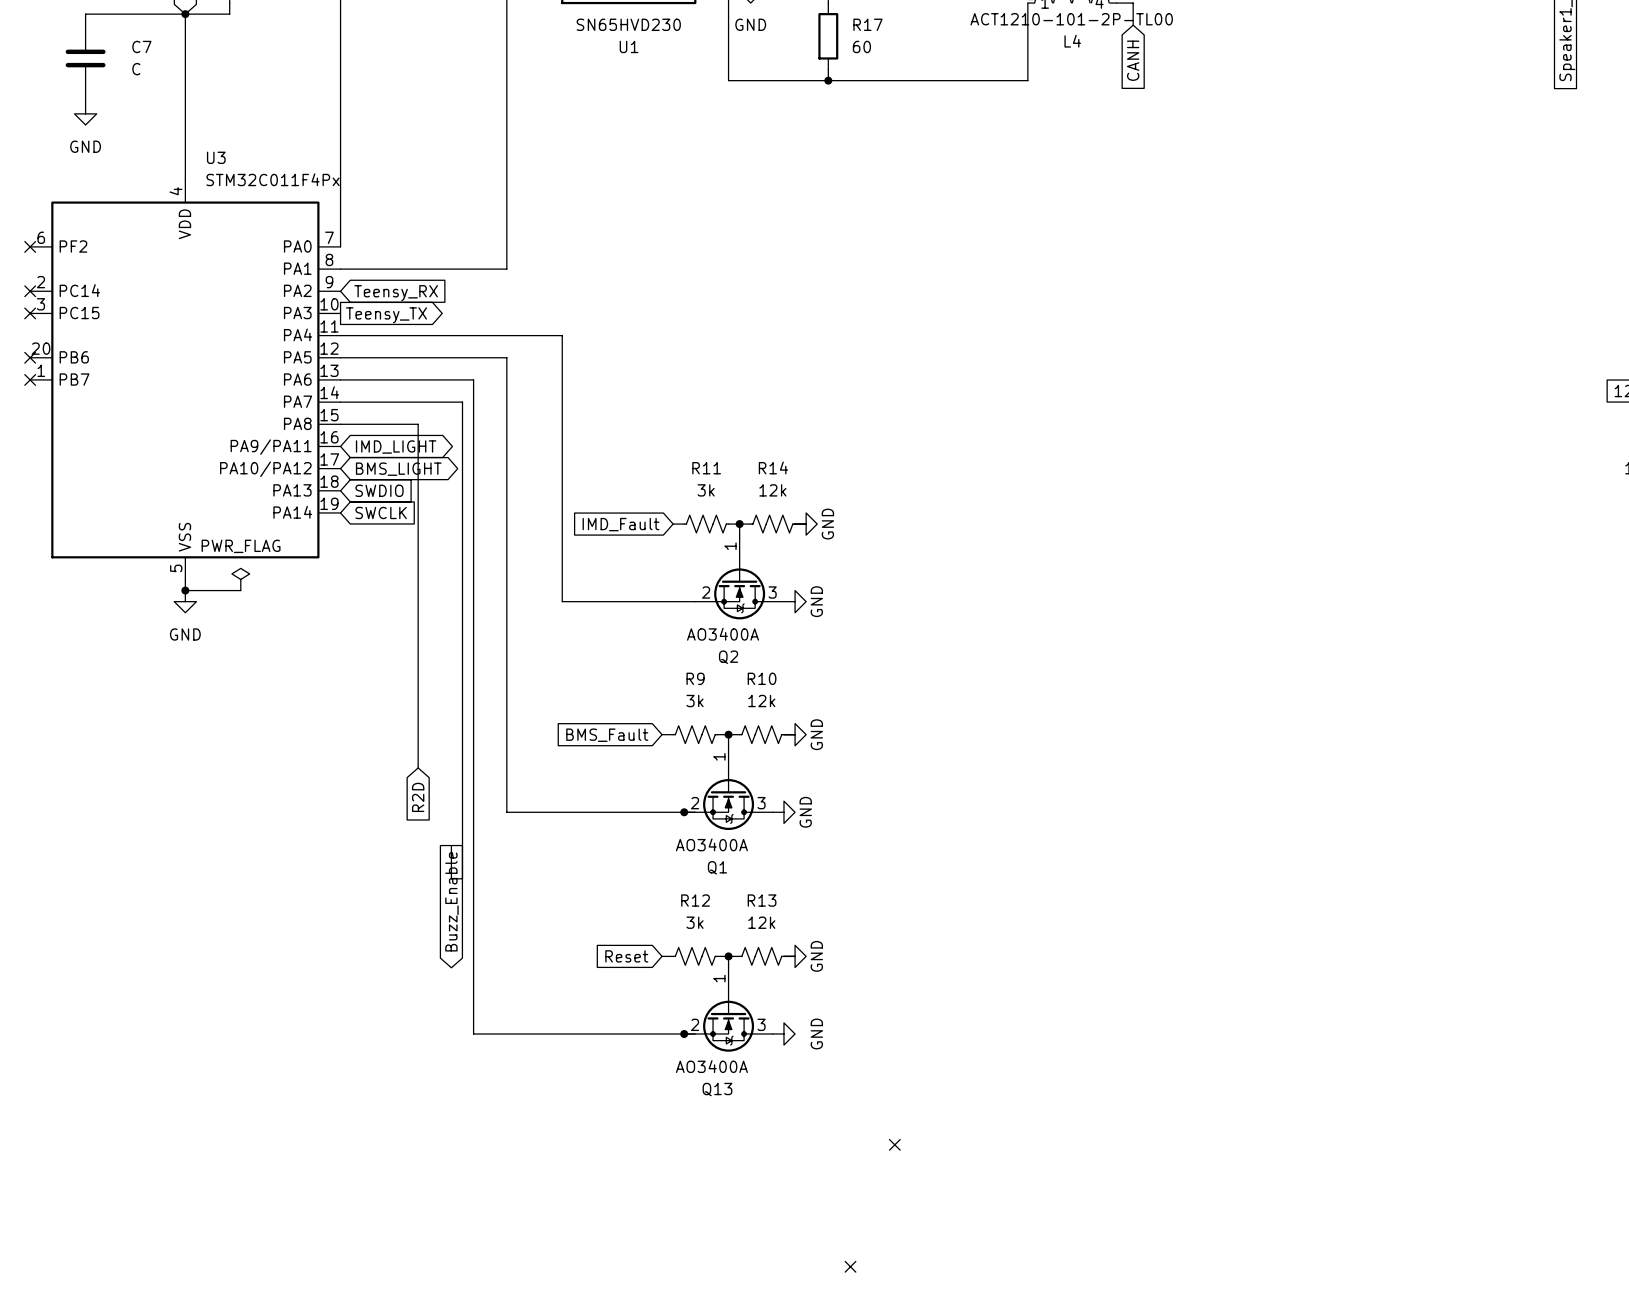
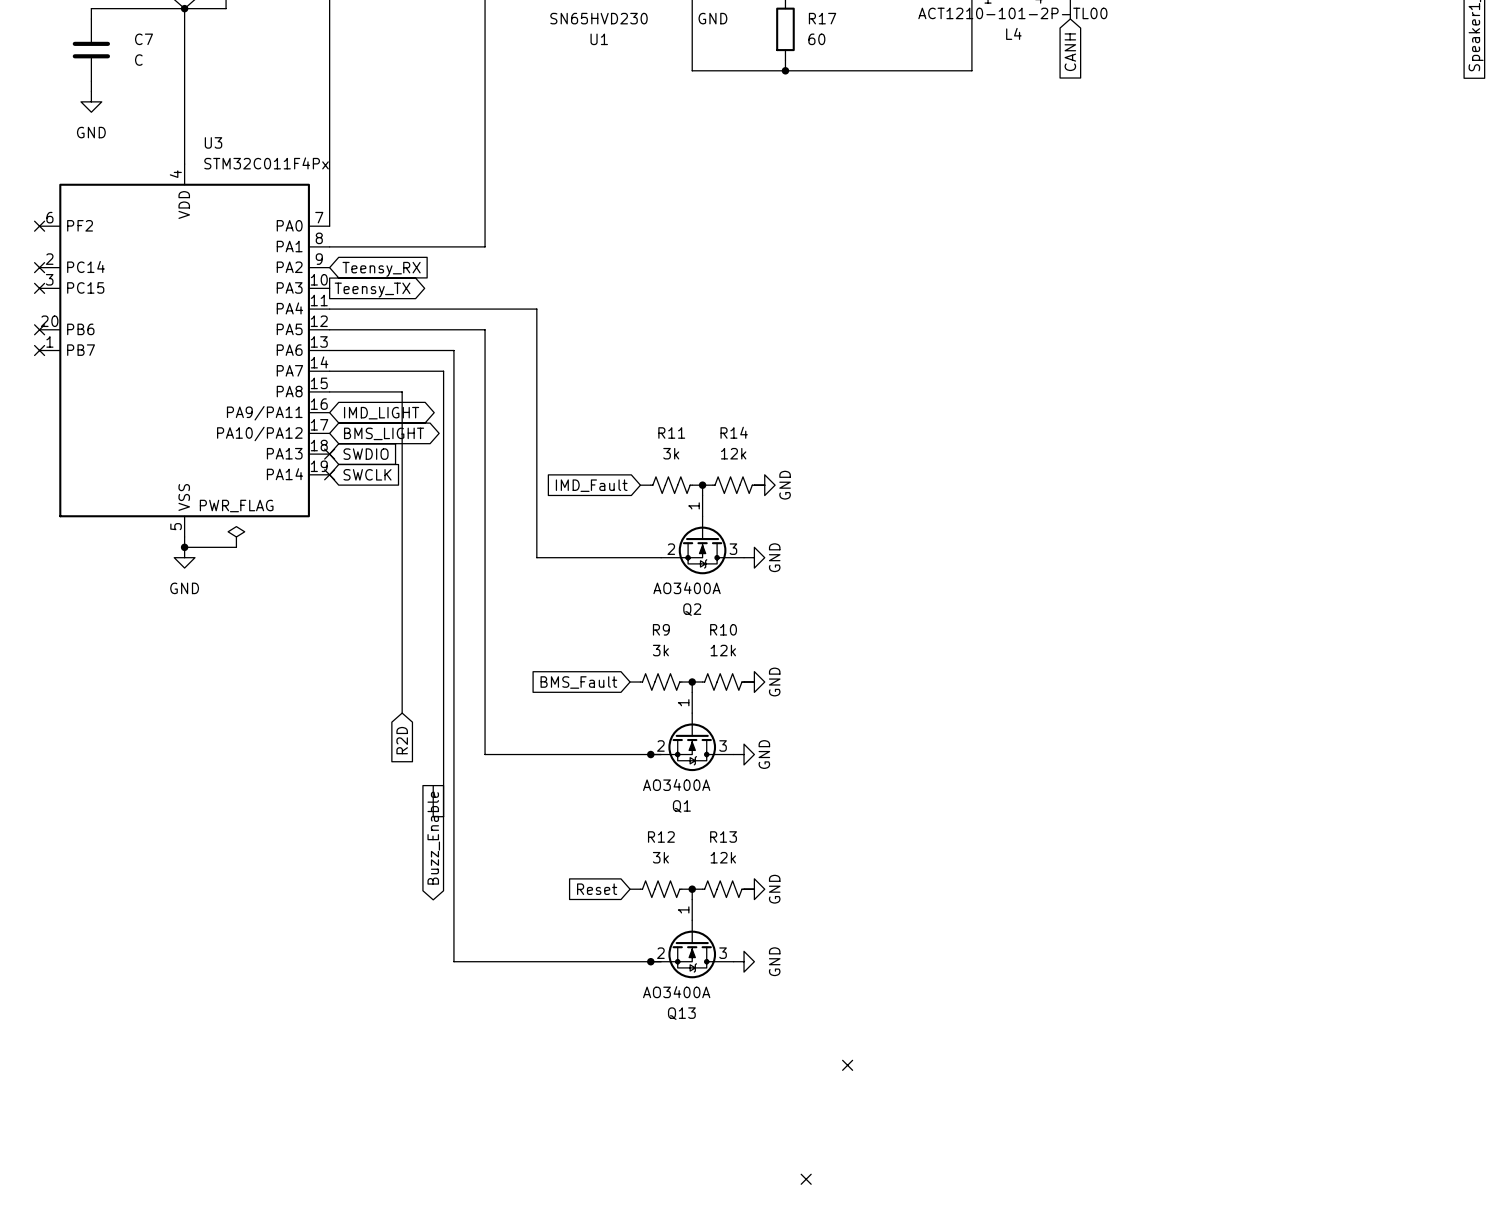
no-connect mark: none -> (329, 454)
no-connect mark: none -> (329, 474)

